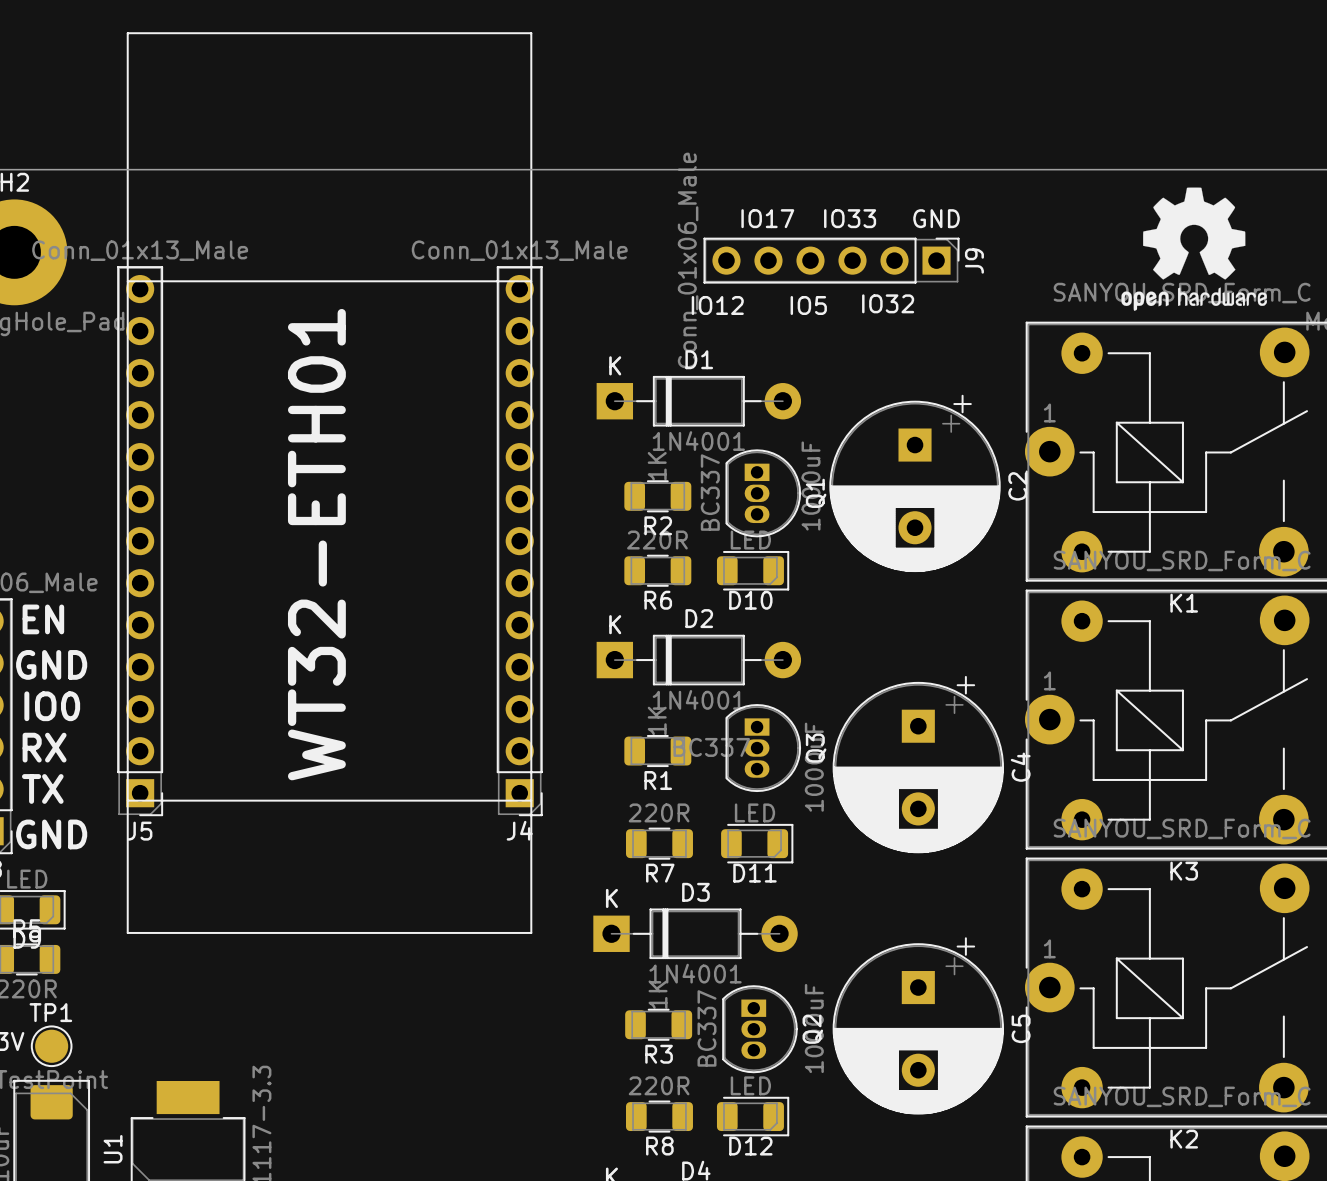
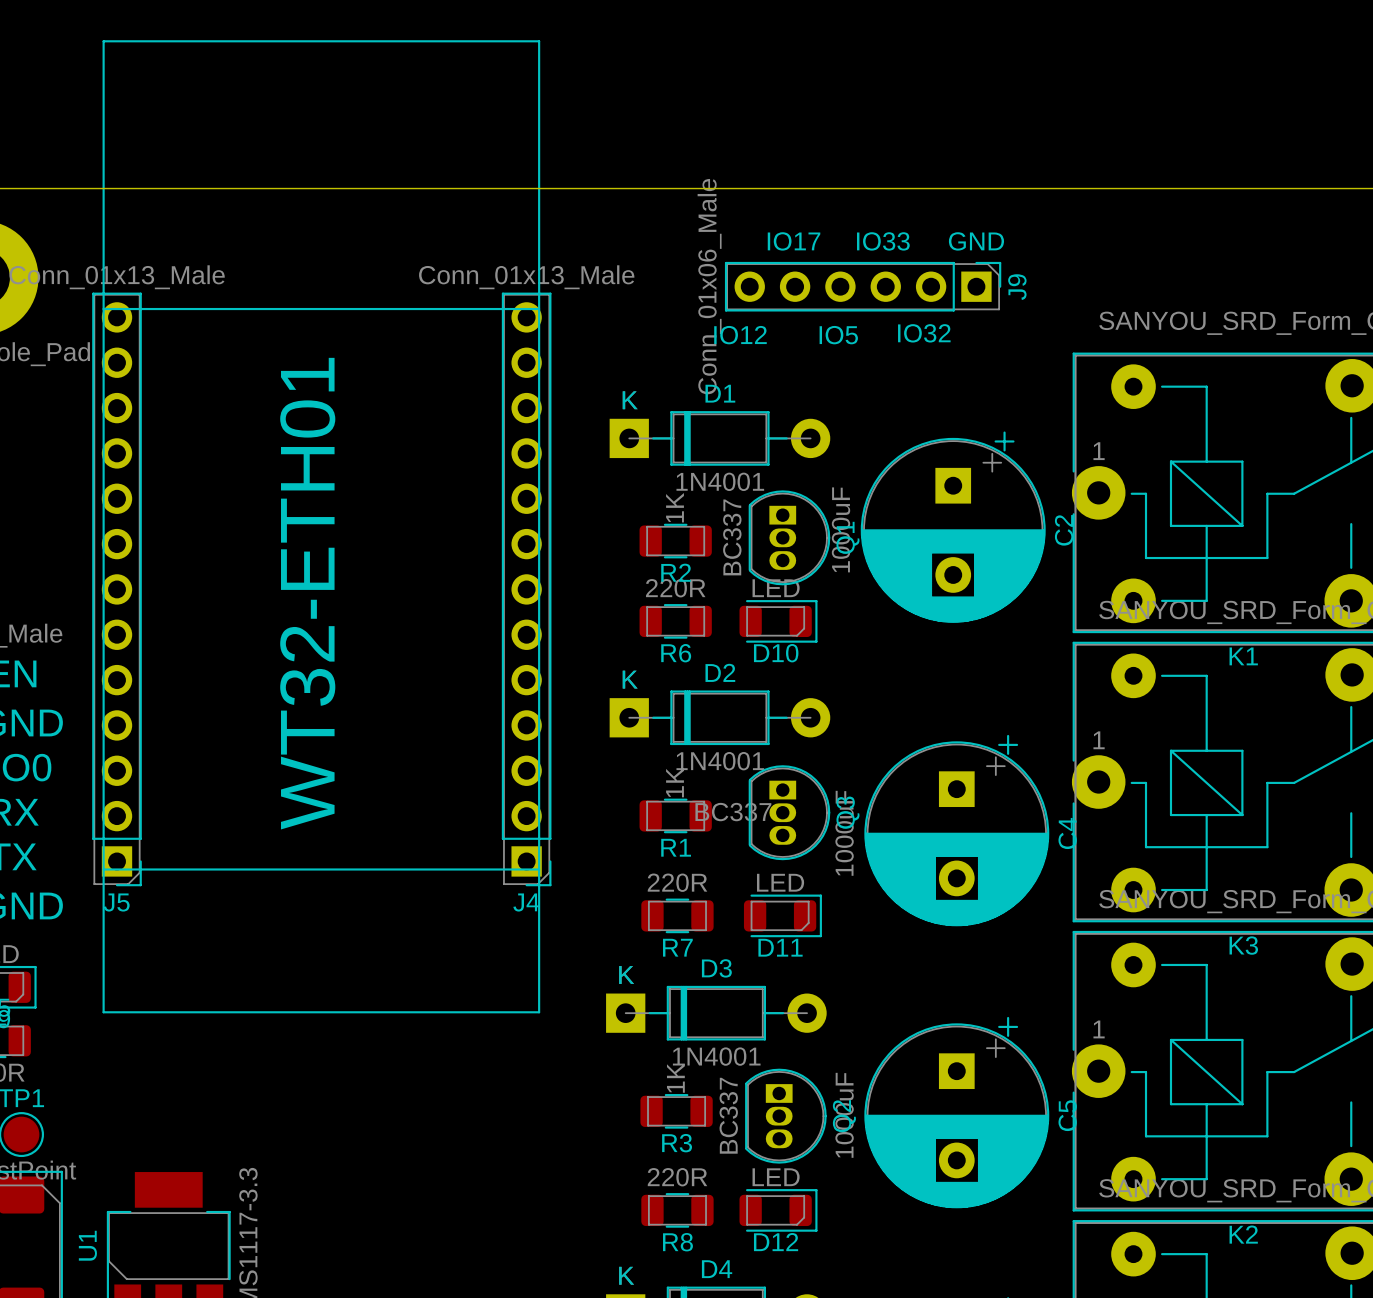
drawing: [1121, 187, 1268, 311] -> none

